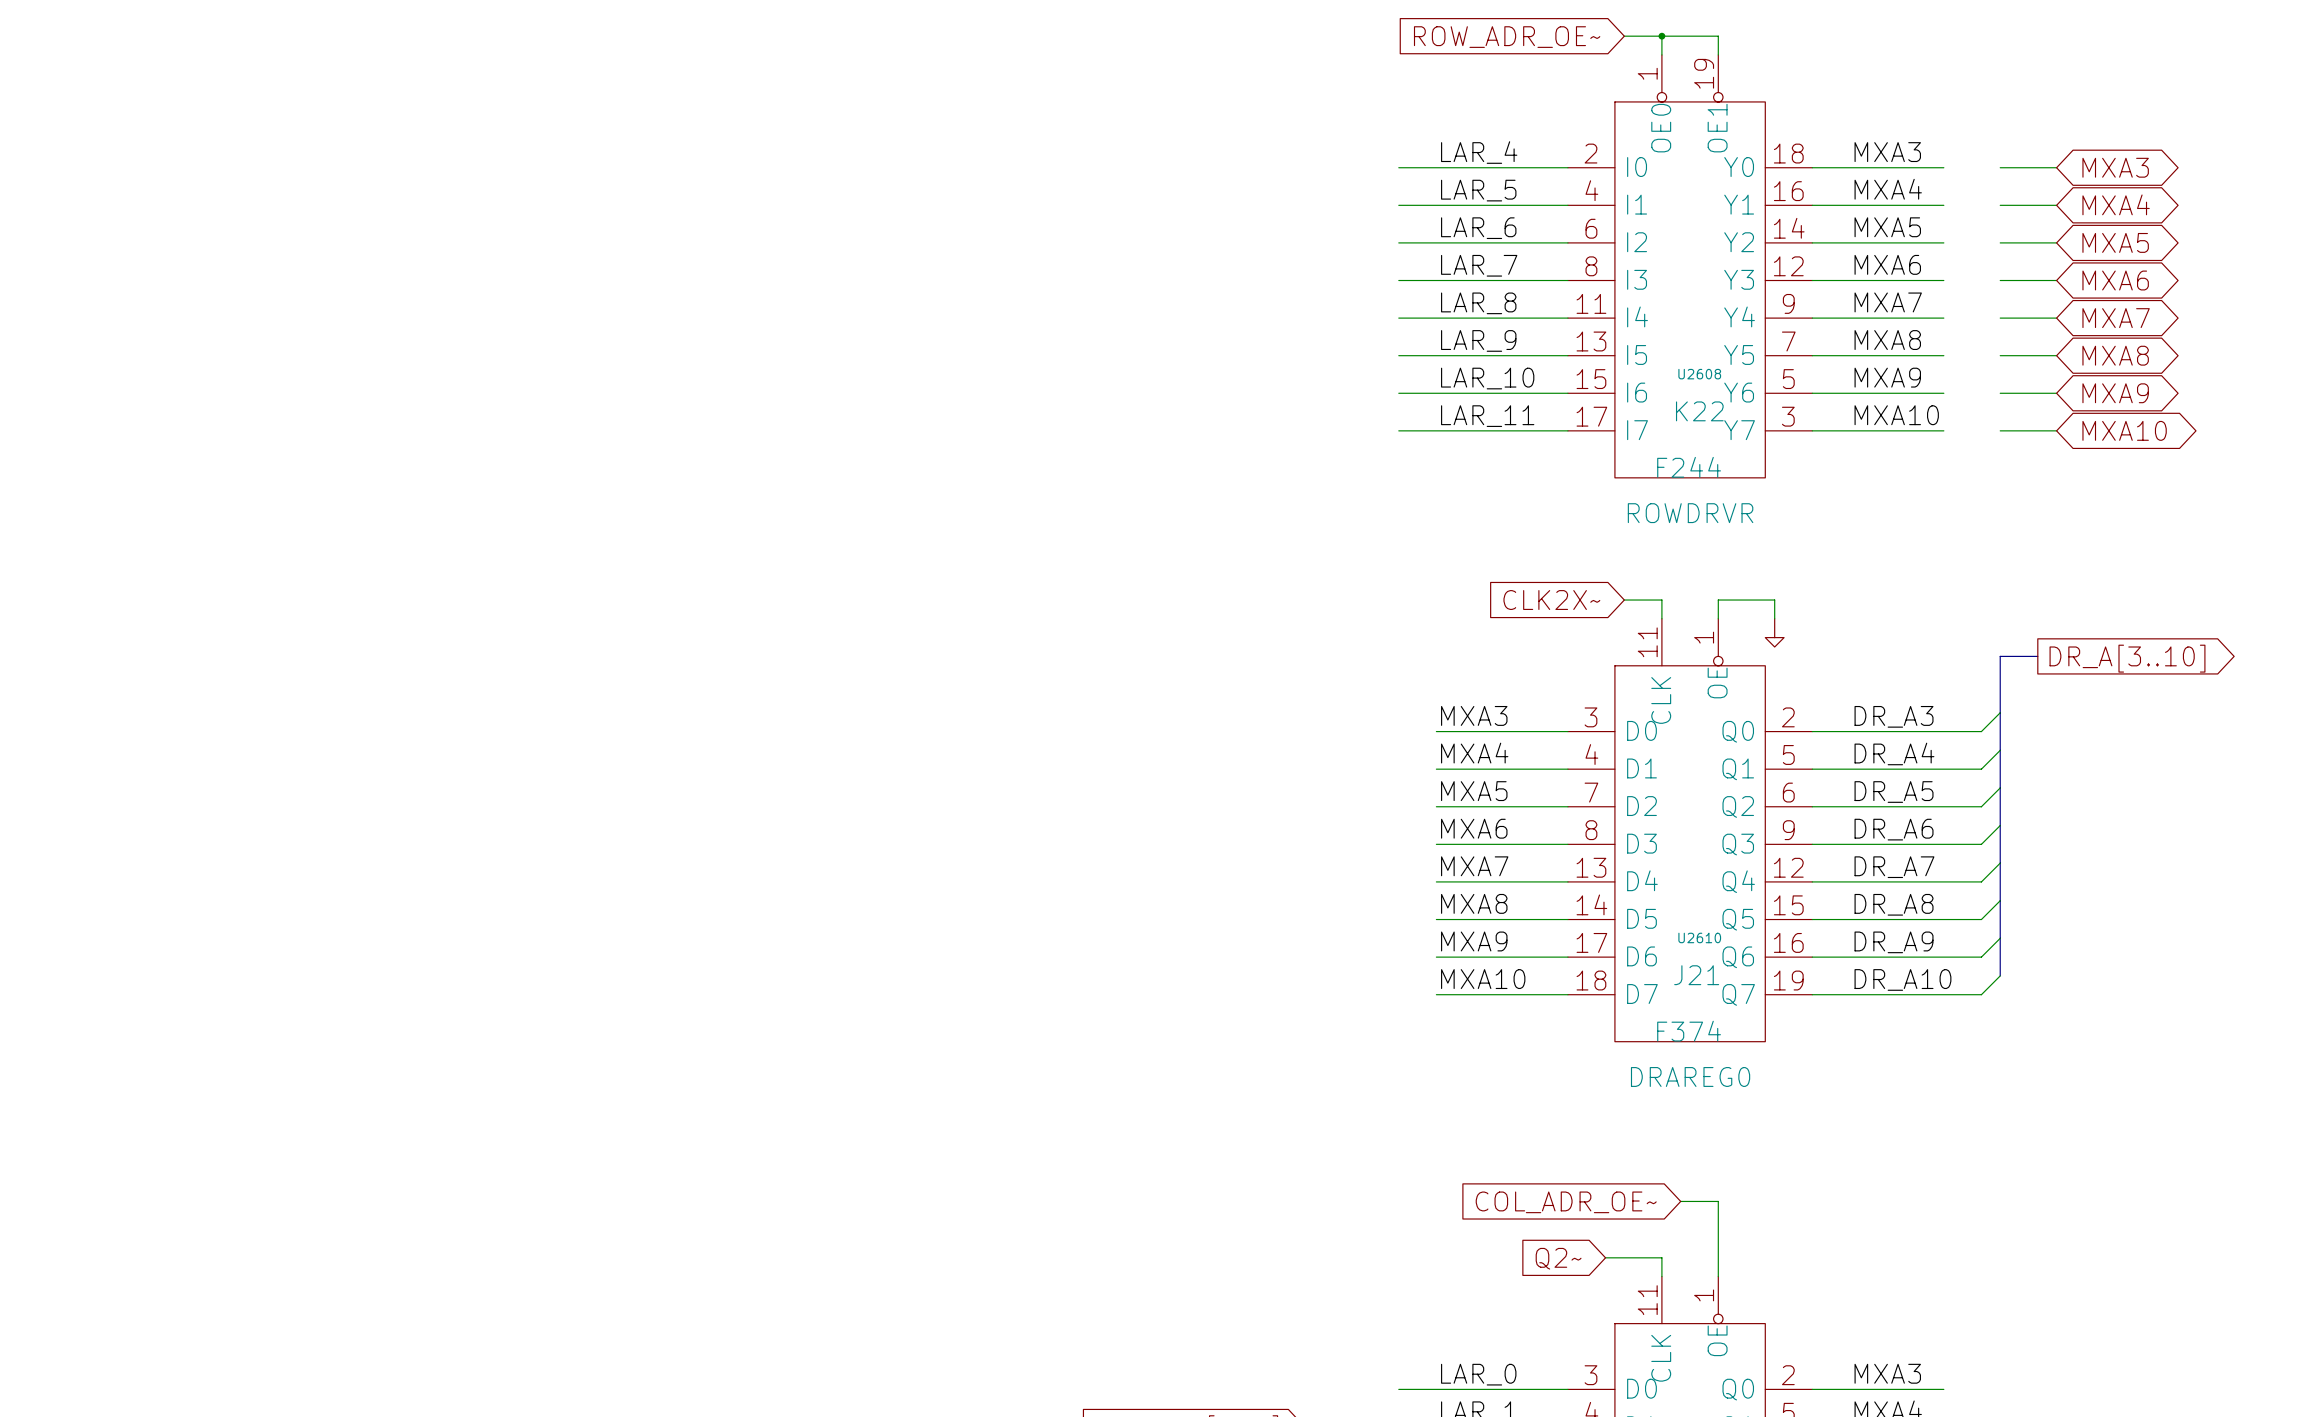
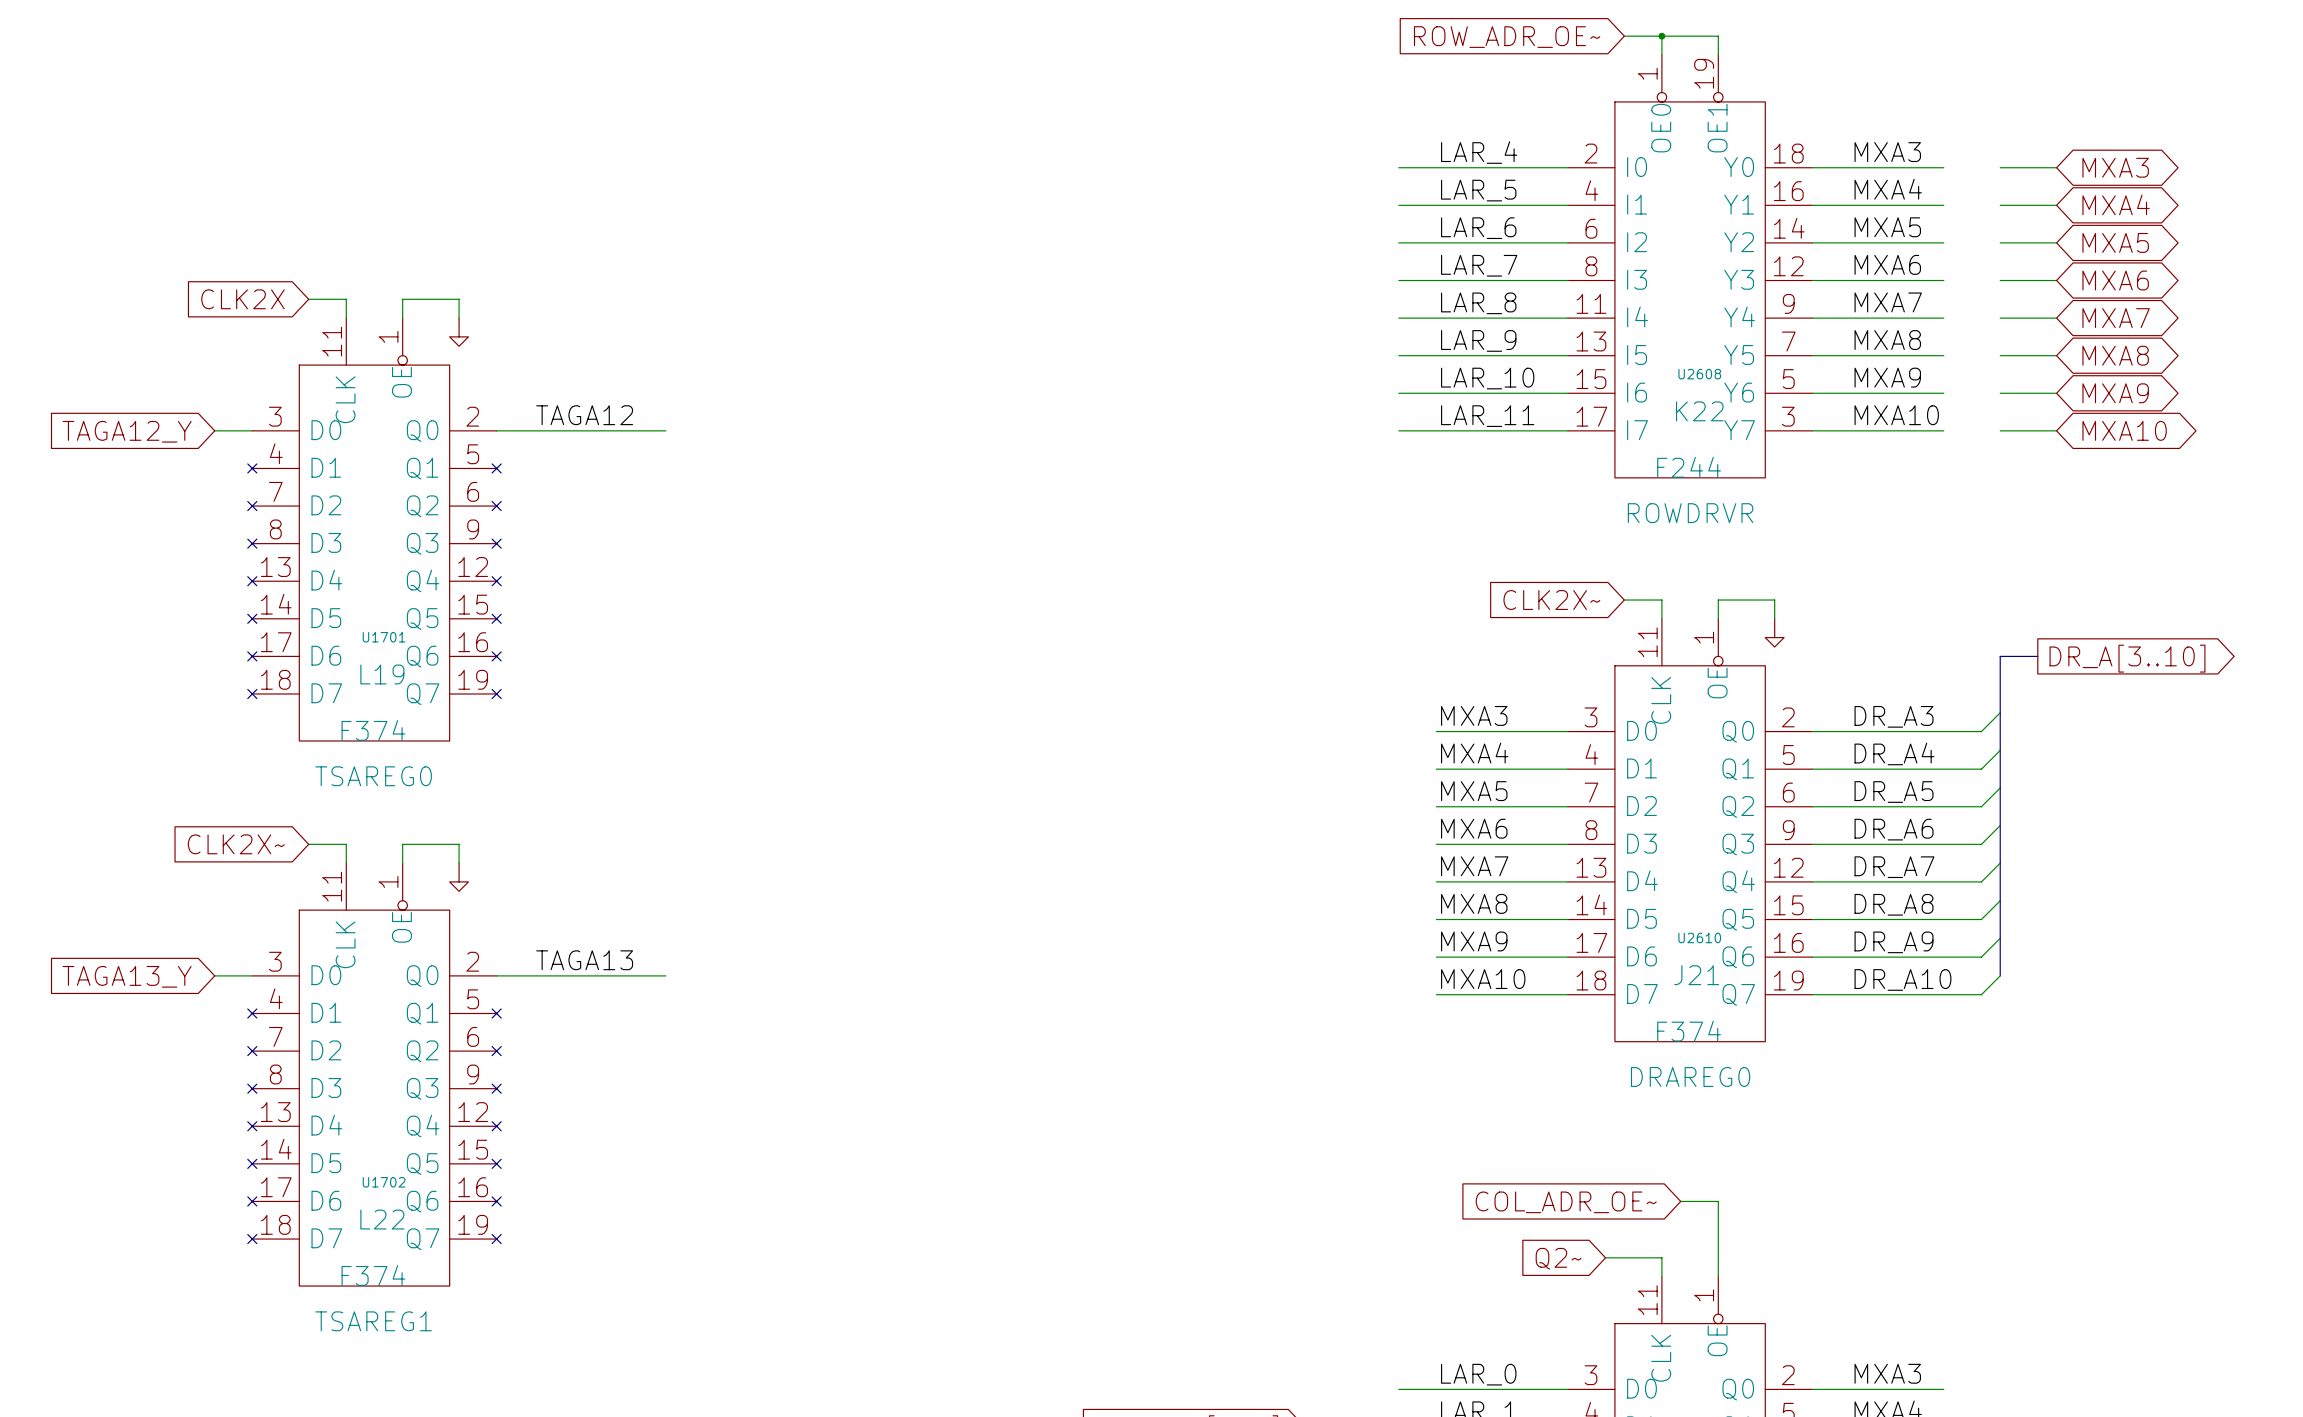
global label: none -> CLK2X (242, 299)
wire: none -> (308, 299) (346, 299) (346, 318)
wire: none -> (402, 318) (402, 299) (459, 299) (459, 318)
power symbol: none -> (459, 332)
label: none -> TAGA12 (584, 415)
wire: none -> (214, 430) (252, 430)
wire: none -> (496, 430) (665, 430)
global label: none -> TAGA12_Y (127, 431)
no-connect mark: none -> (252, 468)
no-connect mark: none -> (496, 468)
no-connect mark: none -> (252, 506)
no-connect mark: none -> (496, 506)
U1701: none -> F374 (374, 529)
no-connect mark: none -> (252, 543)
no-connect mark: none -> (496, 543)
no-connect mark: none -> (252, 581)
no-connect mark: none -> (496, 581)
no-connect mark: none -> (252, 618)
no-connect mark: none -> (496, 618)
no-connect mark: none -> (252, 656)
no-connect mark: none -> (496, 656)
no-connect mark: none -> (252, 693)
no-connect mark: none -> (496, 693)
global label: none -> CLK2X~ (236, 844)
wire: none -> (308, 844) (346, 844) (346, 863)
wire: none -> (402, 863) (402, 844) (459, 844) (459, 863)
power symbol: none -> (459, 877)
label: none -> TAGA13 (584, 960)
wire: none -> (214, 975) (252, 975)
wire: none -> (496, 975) (665, 975)
global label: none -> TAGA13_Y (127, 976)
no-connect mark: none -> (252, 1013)
no-connect mark: none -> (496, 1013)
no-connect mark: none -> (252, 1051)
no-connect mark: none -> (496, 1051)
U1702: none -> F374 (374, 1074)
no-connect mark: none -> (252, 1088)
no-connect mark: none -> (496, 1088)
no-connect mark: none -> (252, 1126)
no-connect mark: none -> (496, 1126)
no-connect mark: none -> (252, 1163)
no-connect mark: none -> (496, 1163)
no-connect mark: none -> (252, 1201)
no-connect mark: none -> (496, 1201)
no-connect mark: none -> (252, 1239)
no-connect mark: none -> (496, 1239)

